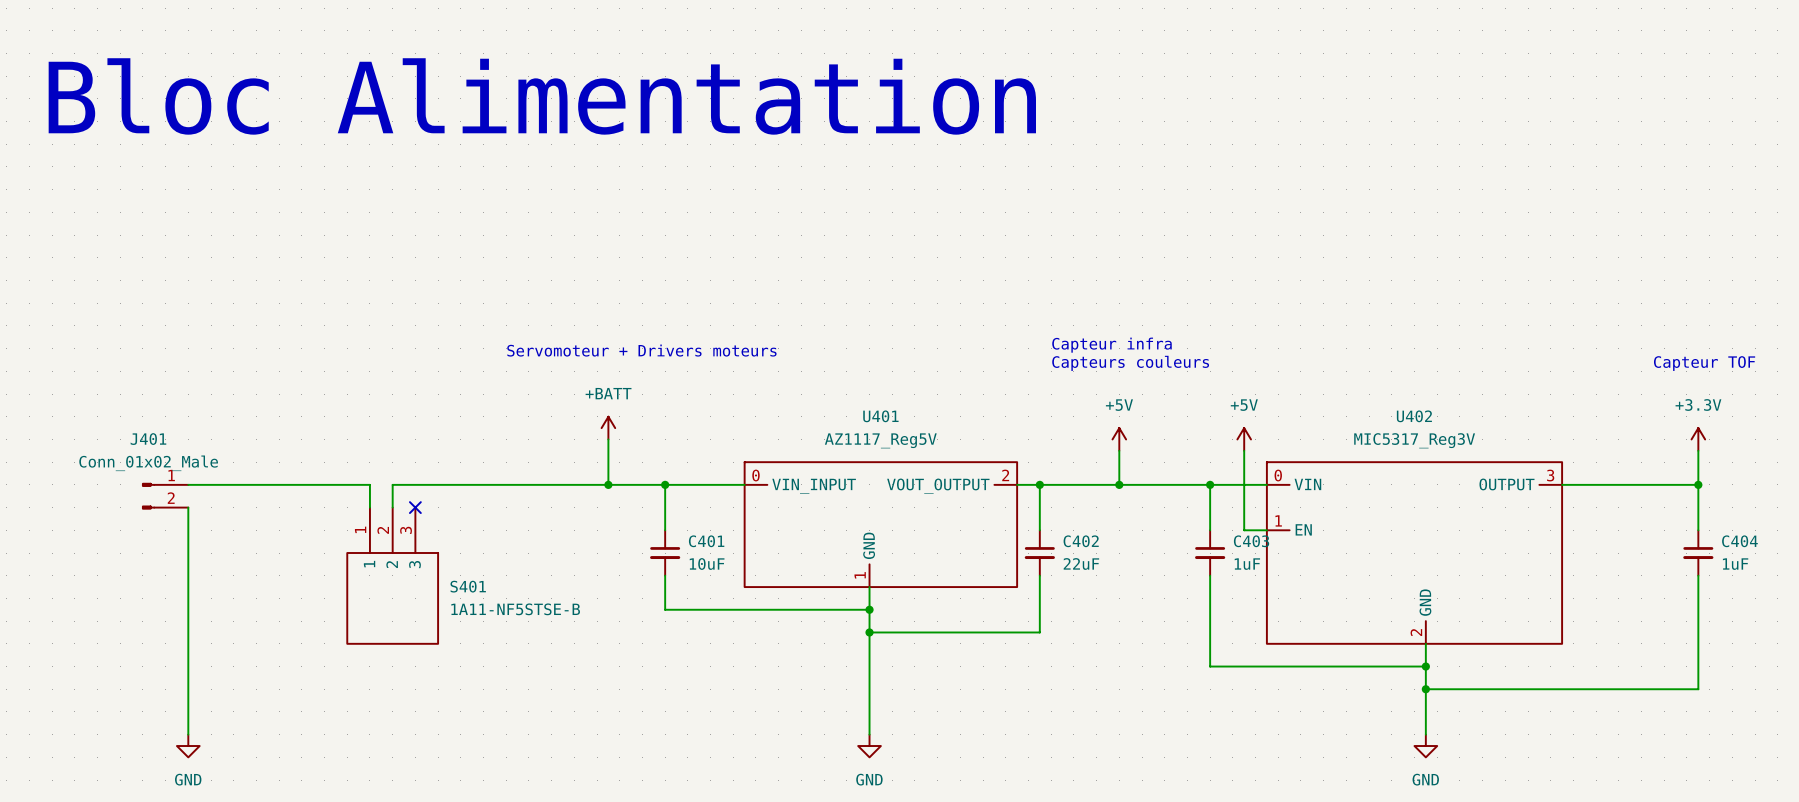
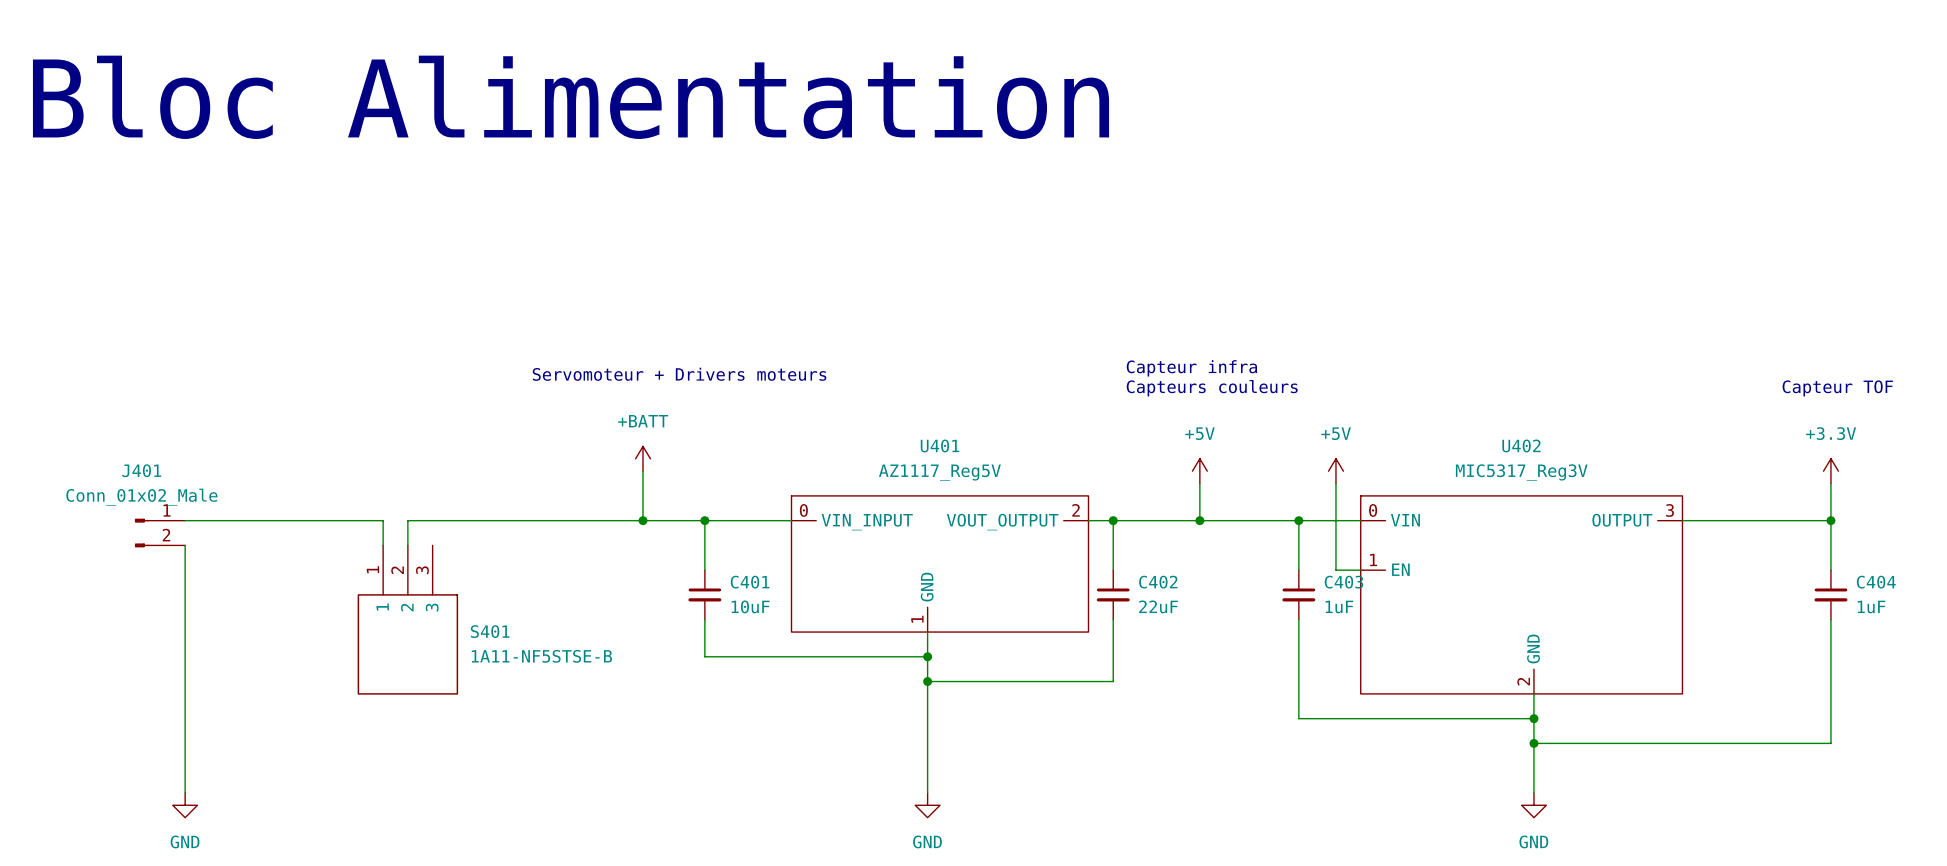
no-connect mark: (415, 507) -> none

